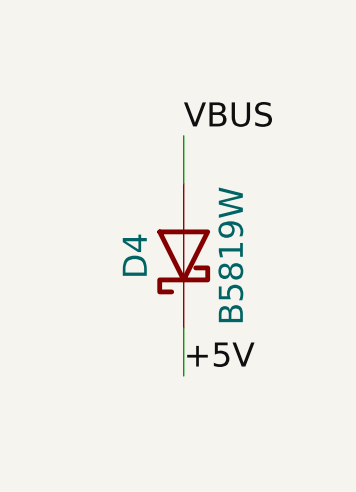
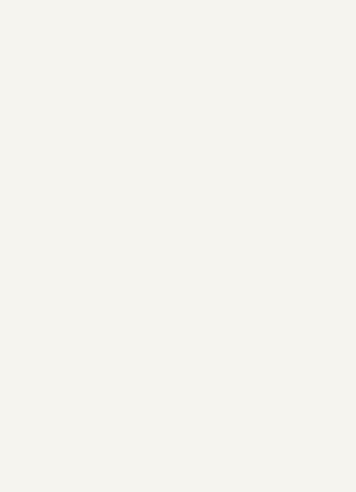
label: VBUS (227, 114) -> none
wire: (183, 135) (183, 183) -> none
D4: B5819W (183, 255) -> none
wire: (183, 327) (183, 375) -> none
label: +5V (220, 354) -> none

